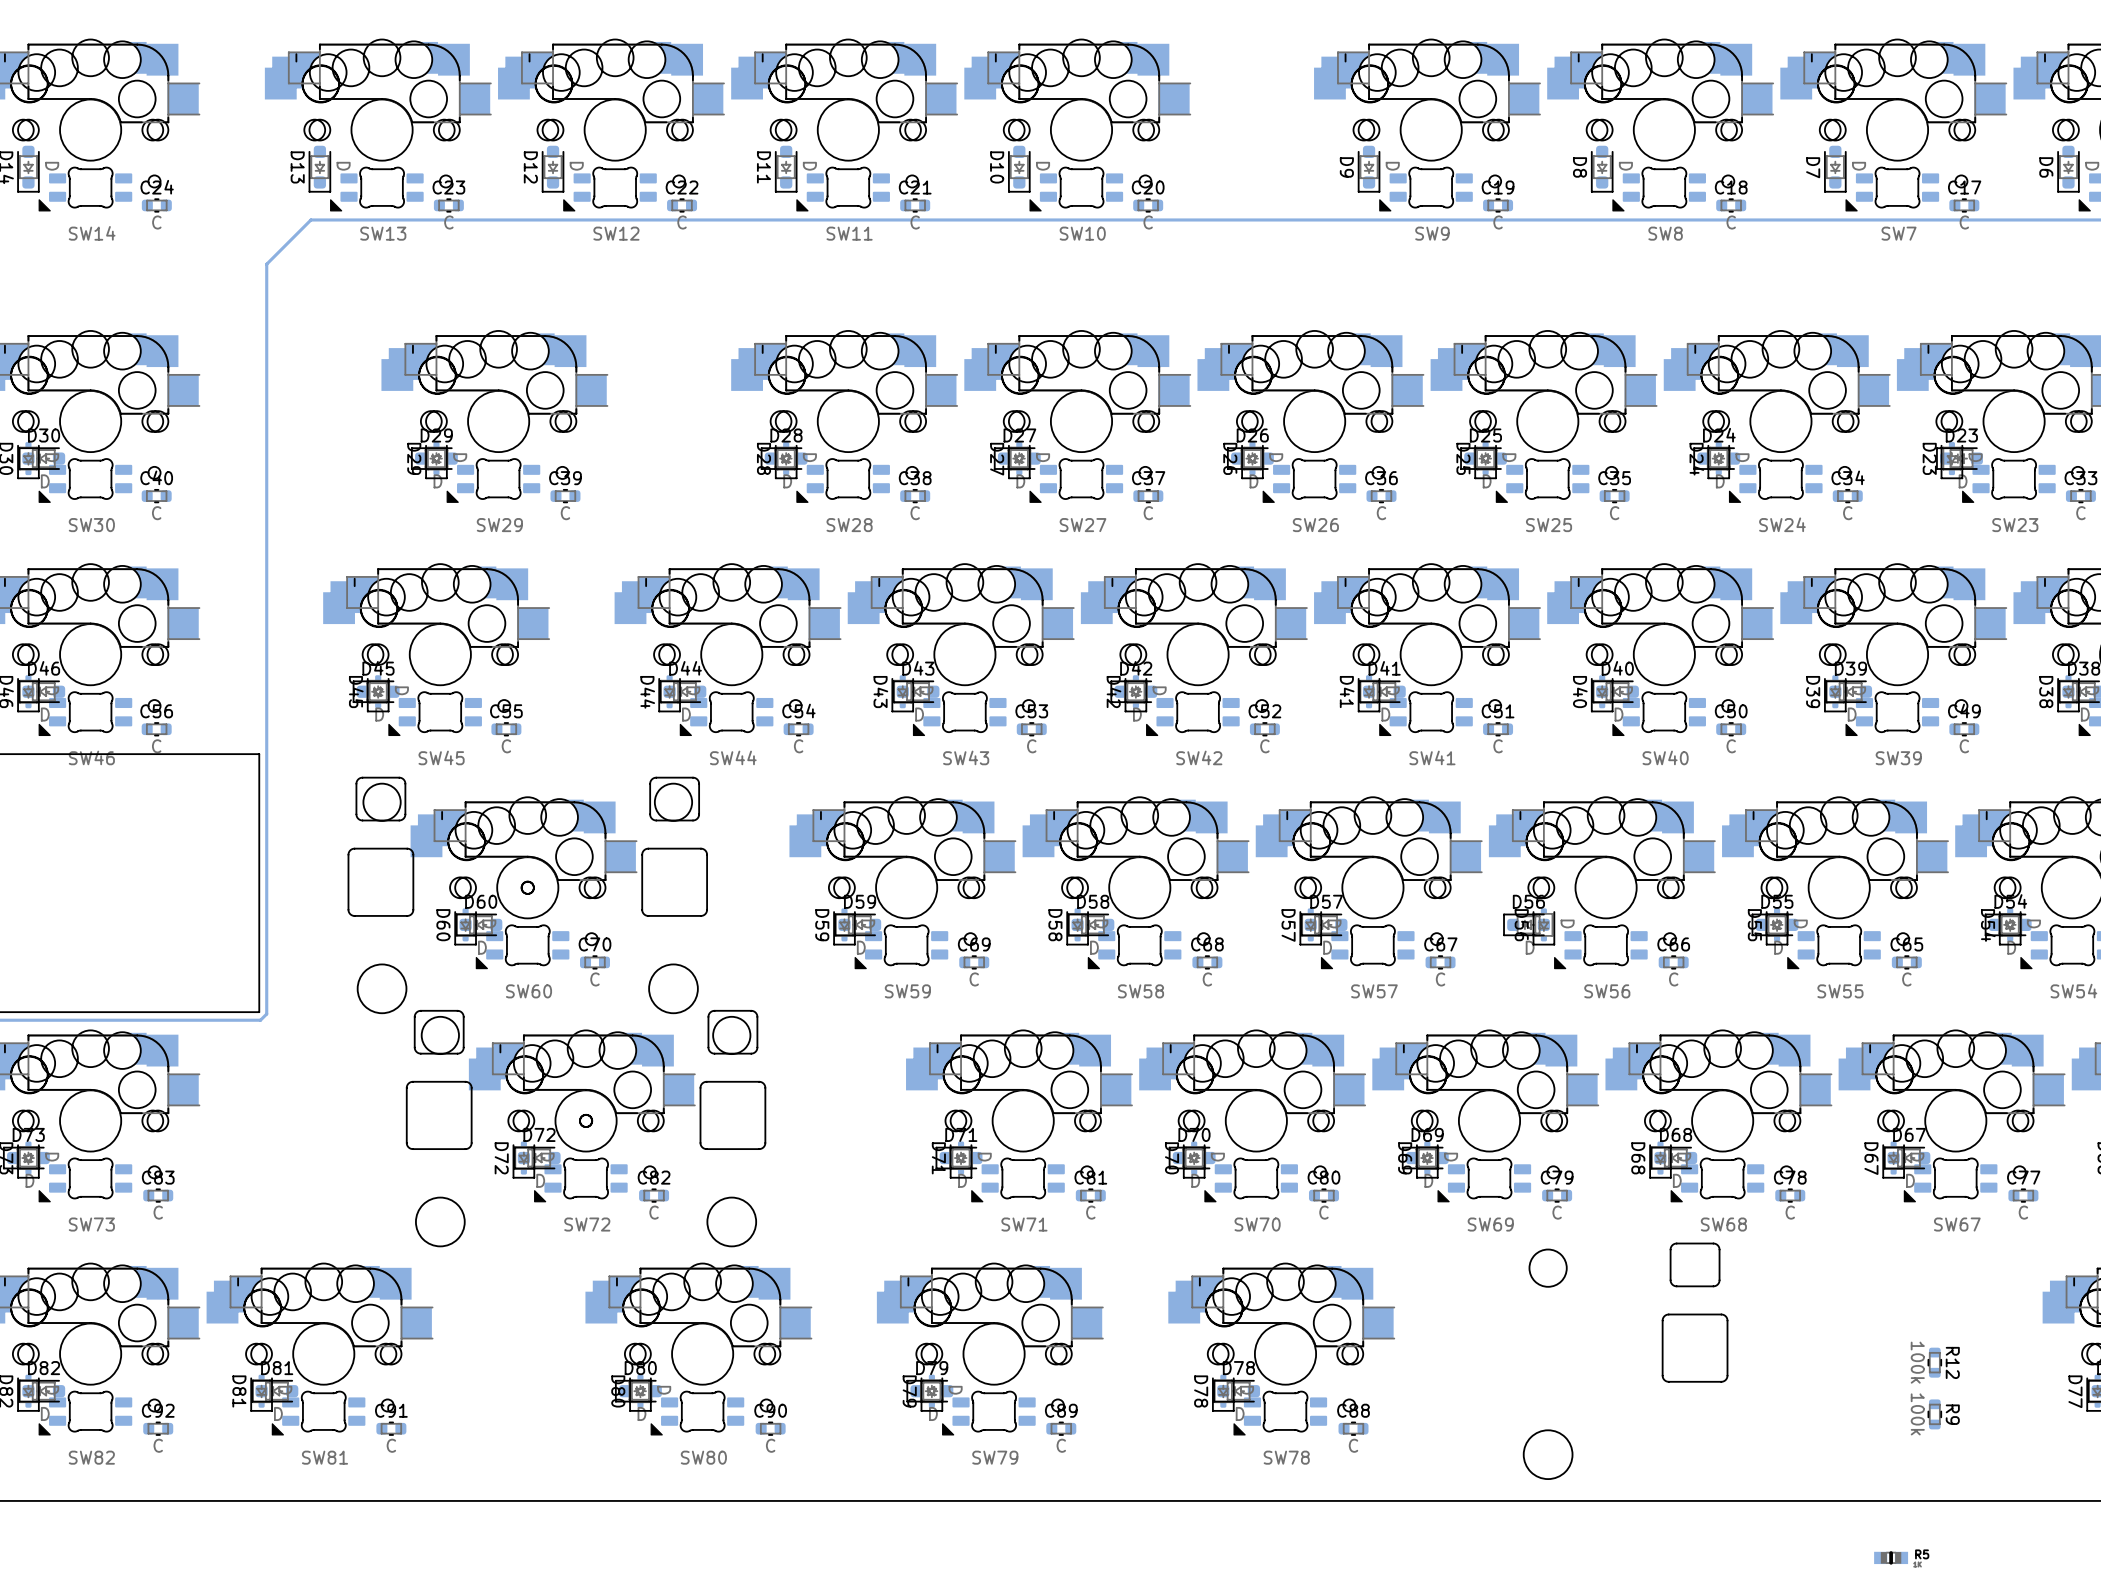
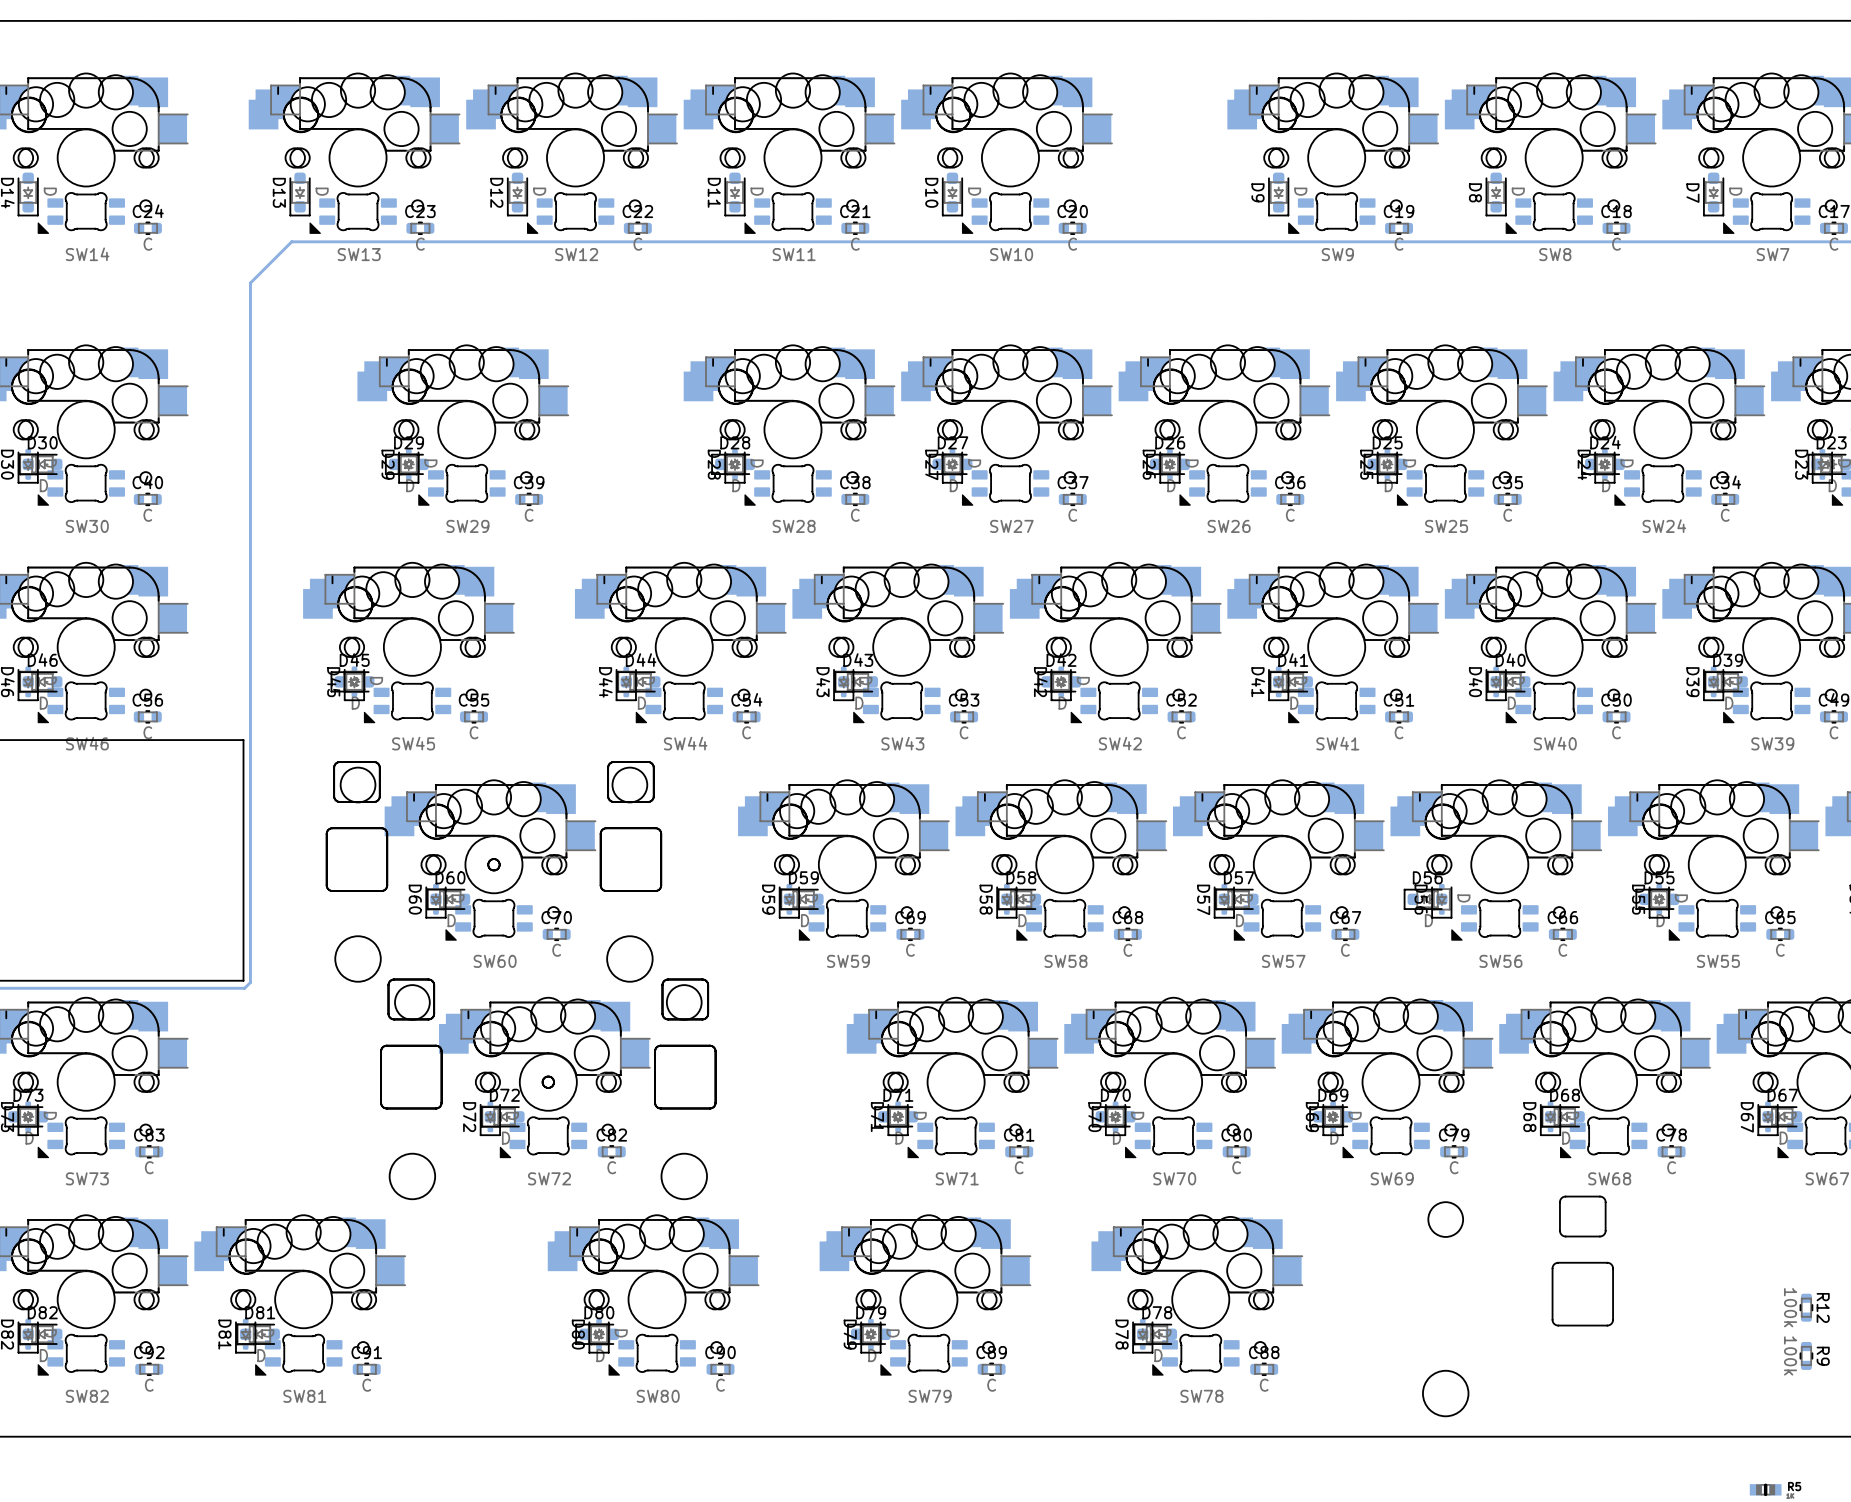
drawing: none -> [326, 761, 662, 892]
drawing: none -> [380, 978, 717, 1110]

